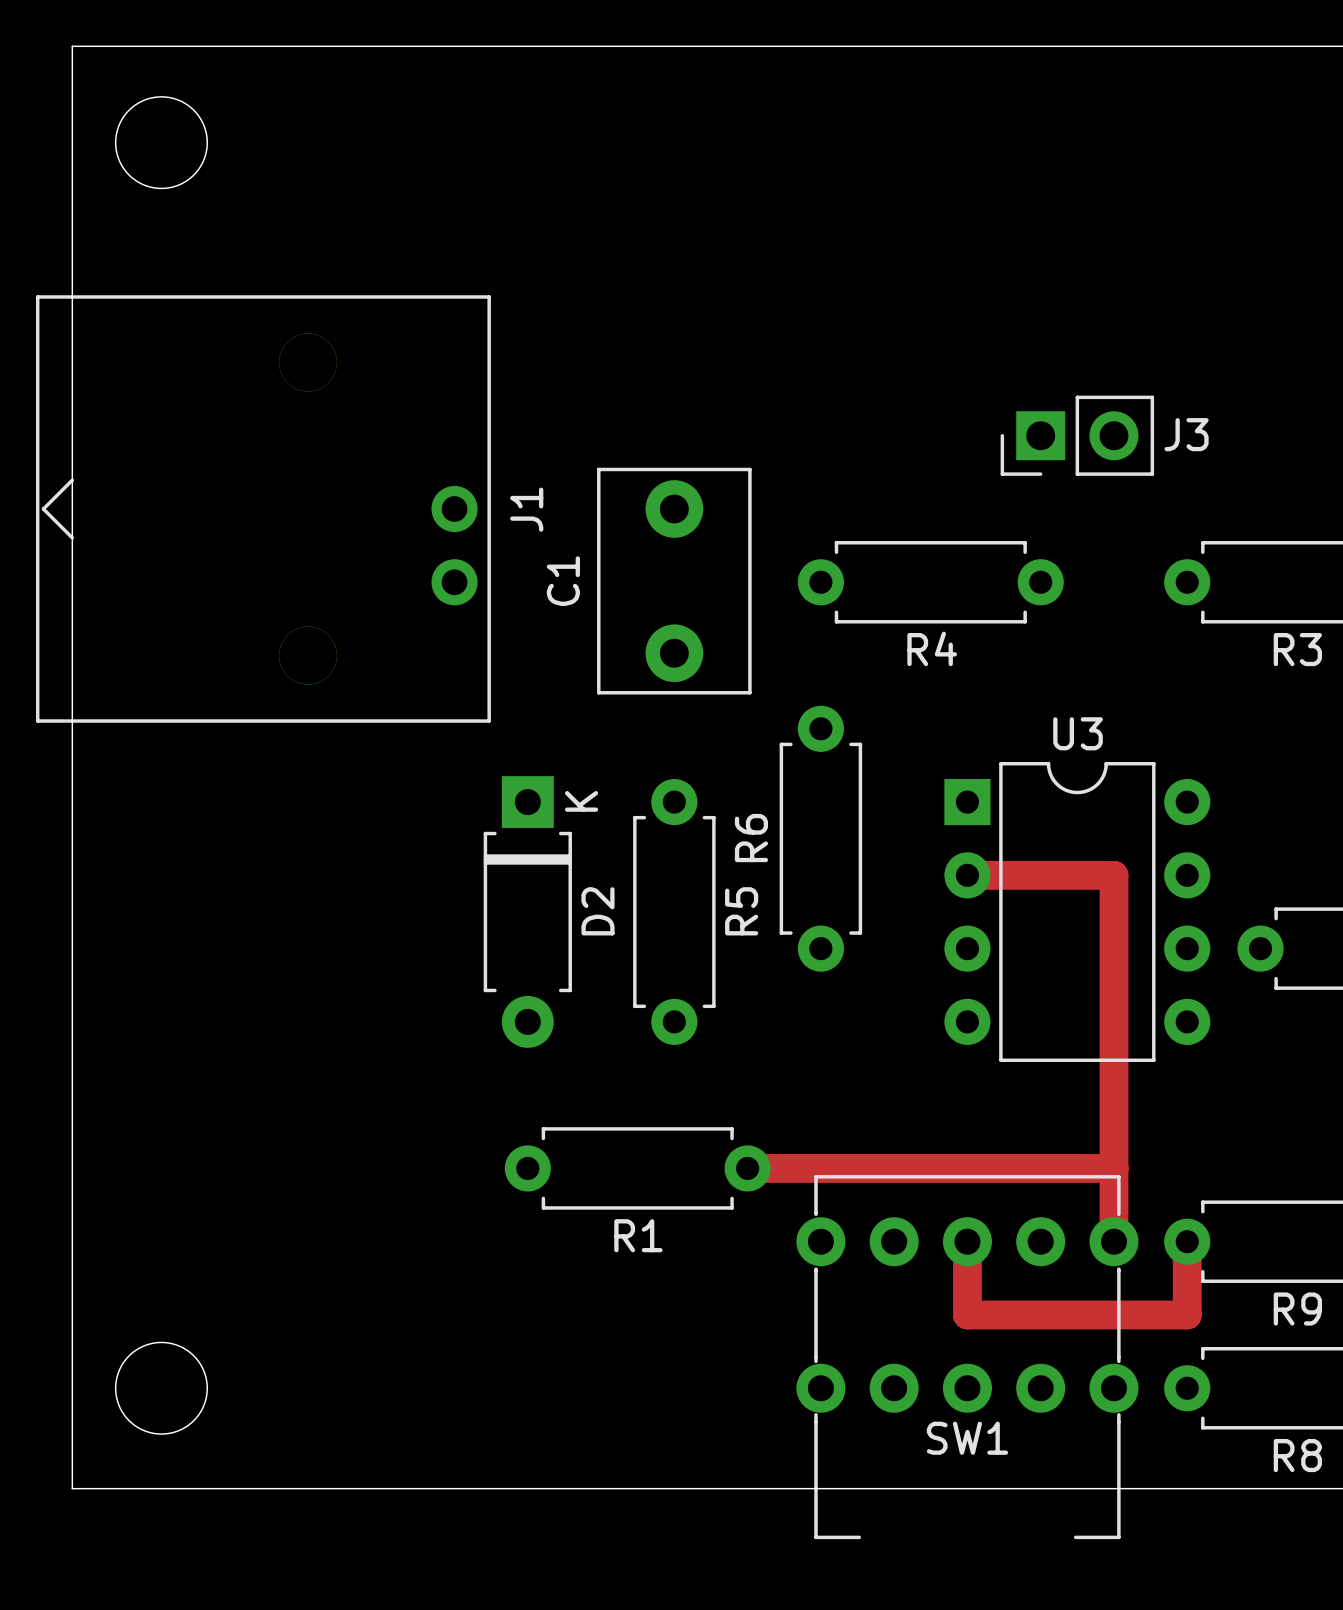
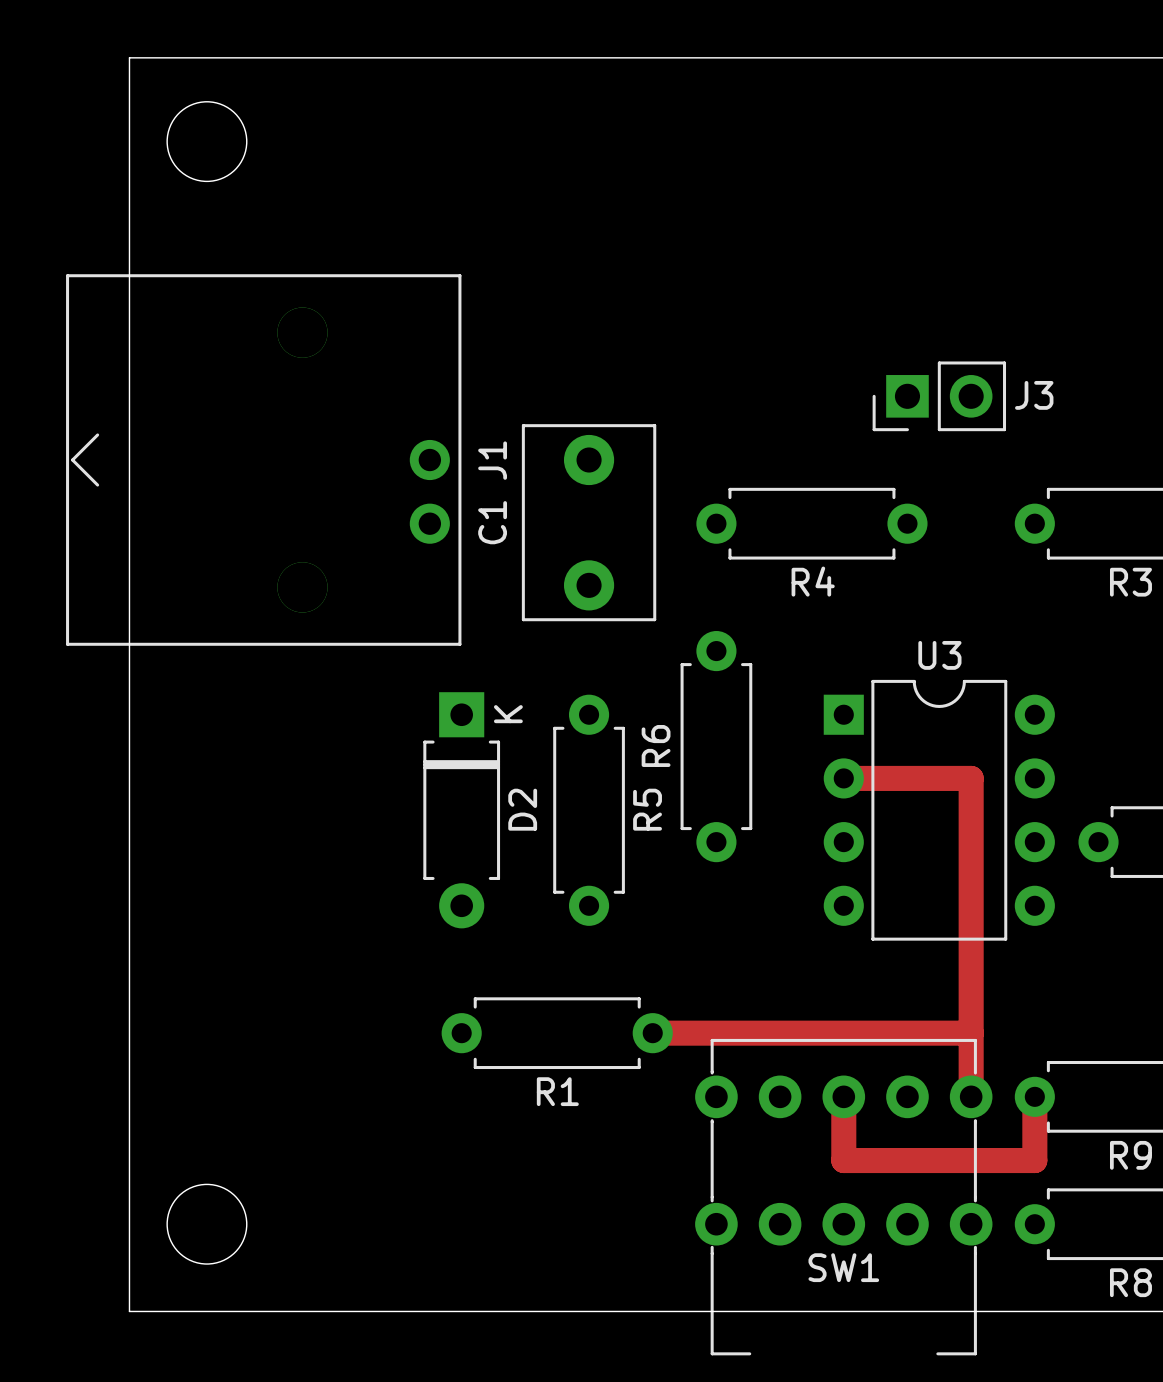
board edge: (145, 46) (72, 46) (72, 1488) (145, 1488) -> (129, 57) (129, 1311)
round board edge position: (161, 142) -> (206, 141)
J1 position: (263, 509) -> (263, 460)
round board edge position: (161, 1388) -> (206, 1224)

